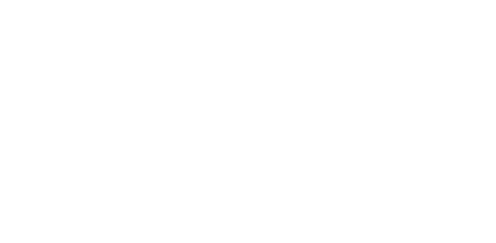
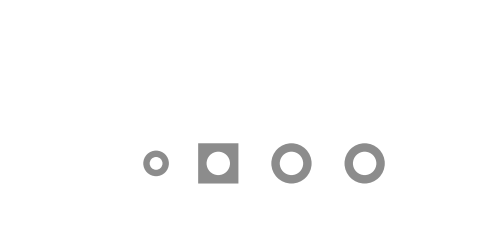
via: none -> (156, 163)
part: none -> (291, 163)

